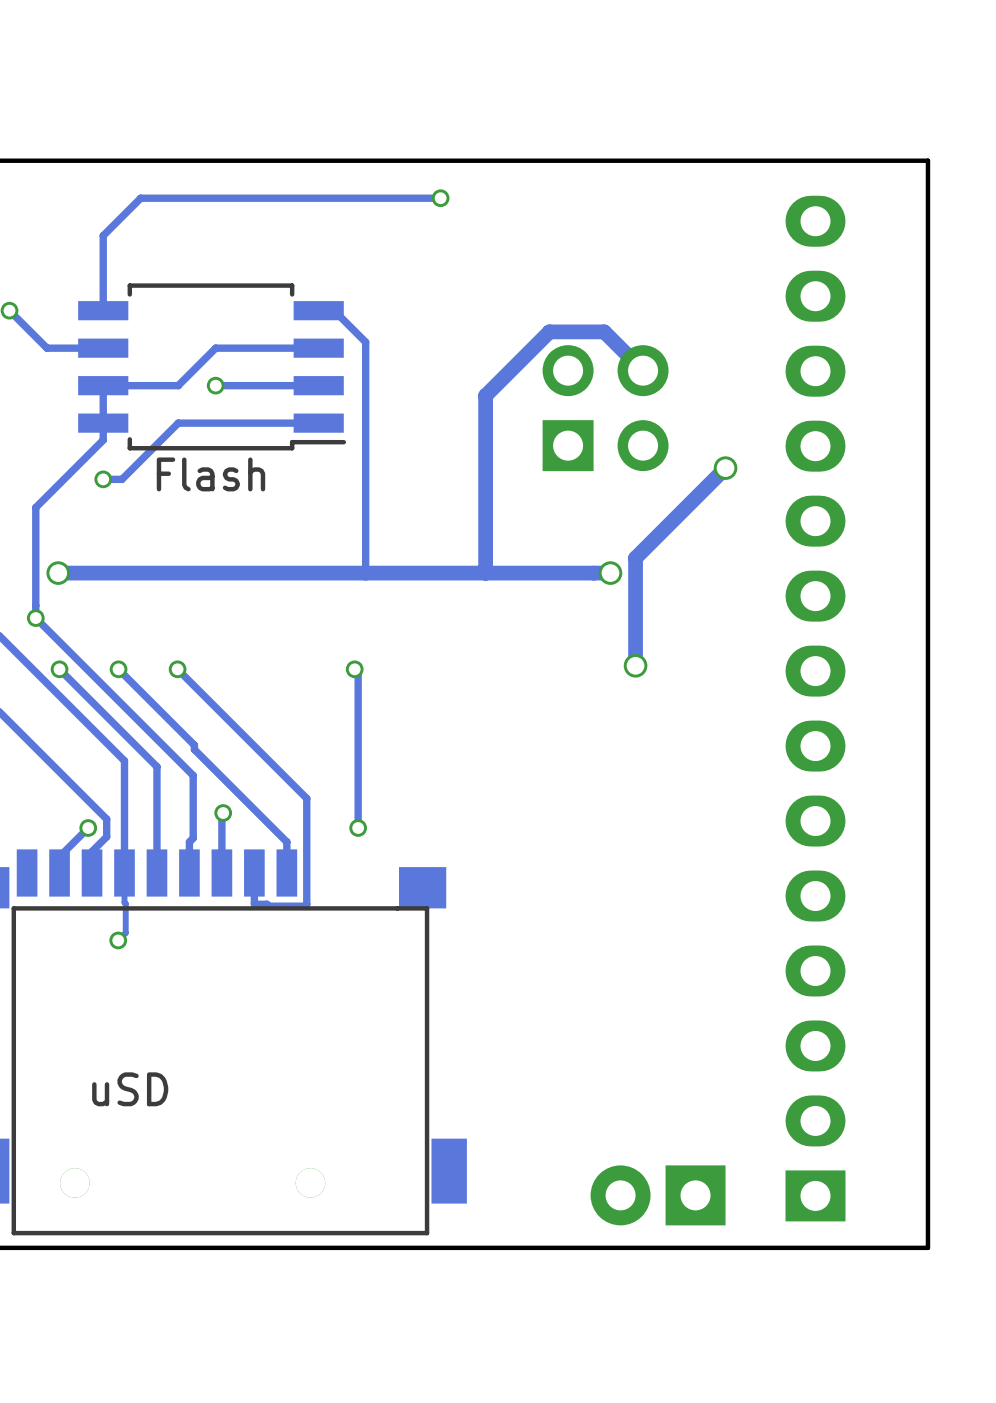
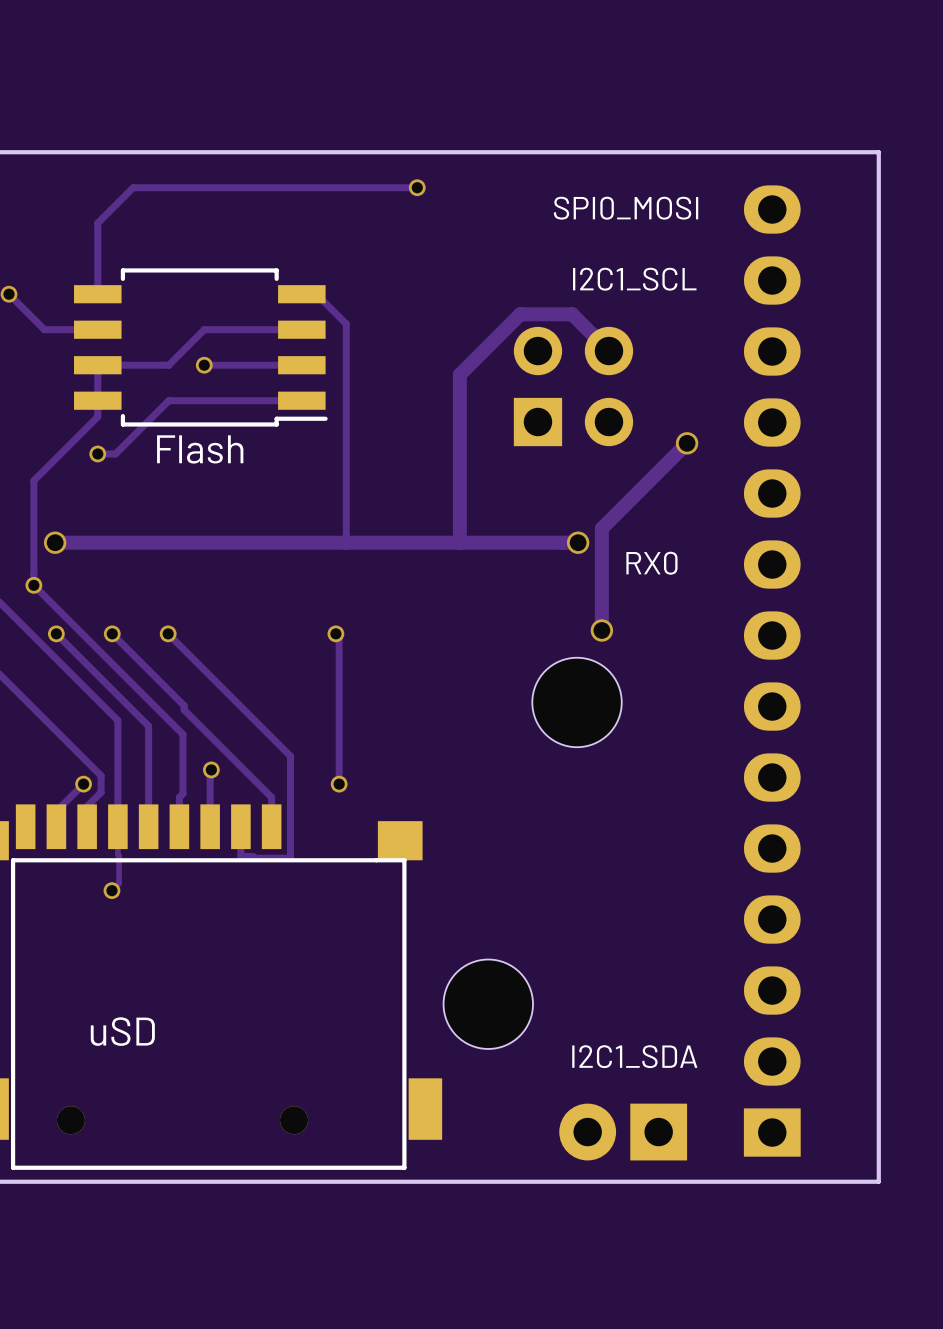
text: none -> SPI0_MOSI (626, 208)
text: none -> I2C1_SCL (634, 279)
text: none -> RX0 (651, 563)
part: none -> (577, 702)
part: none -> (488, 1004)
text: none -> I2C1_SDA (634, 1056)

